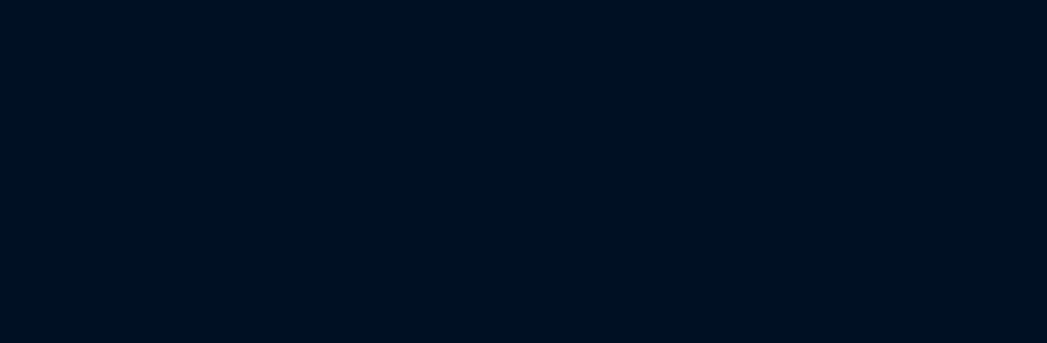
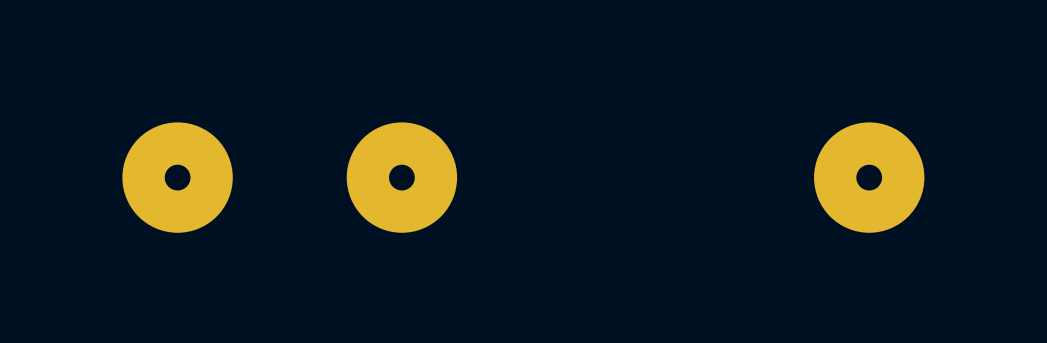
part: none -> (177, 177)
part: none -> (401, 177)
part: none -> (869, 177)

